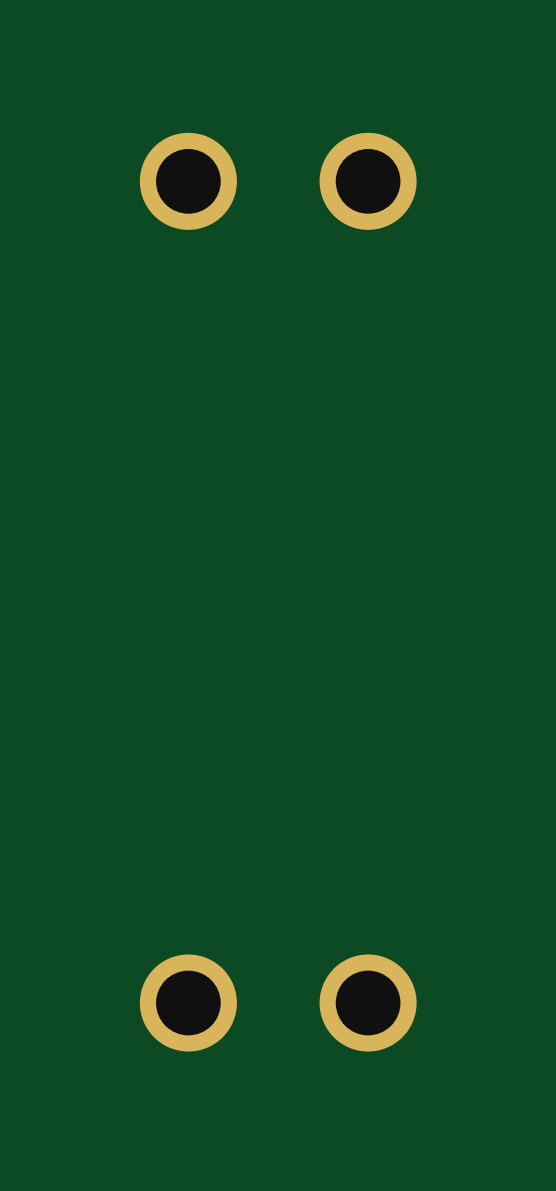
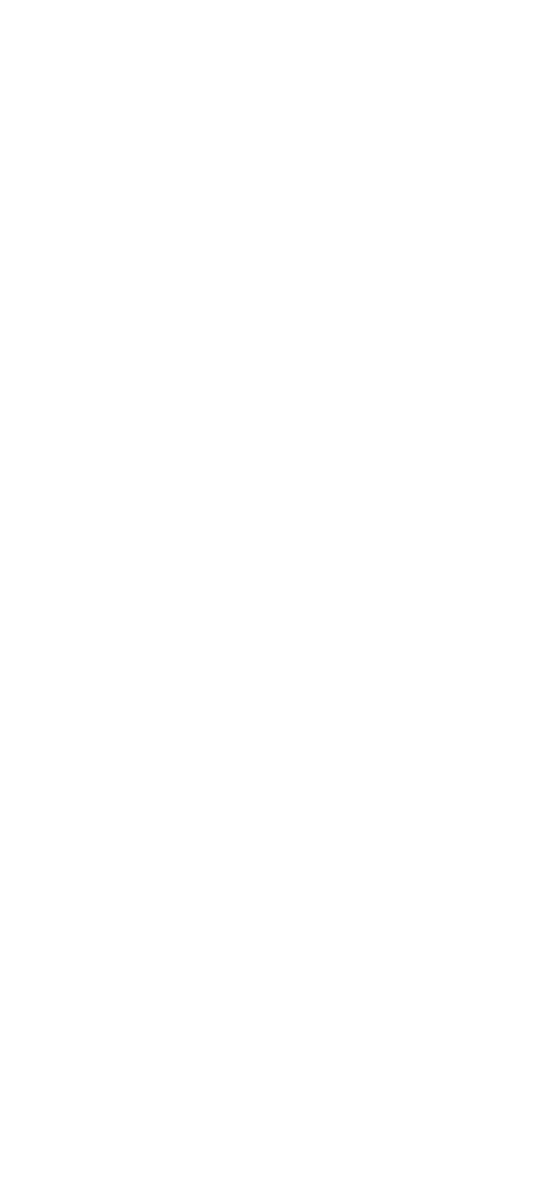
part: (278, 181) -> none
part: (278, 1003) -> none

